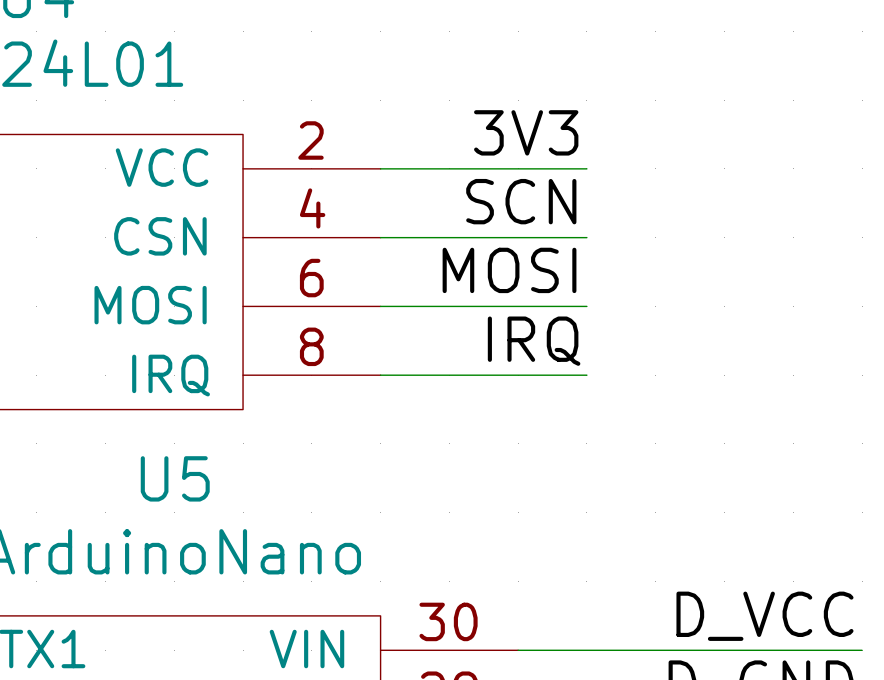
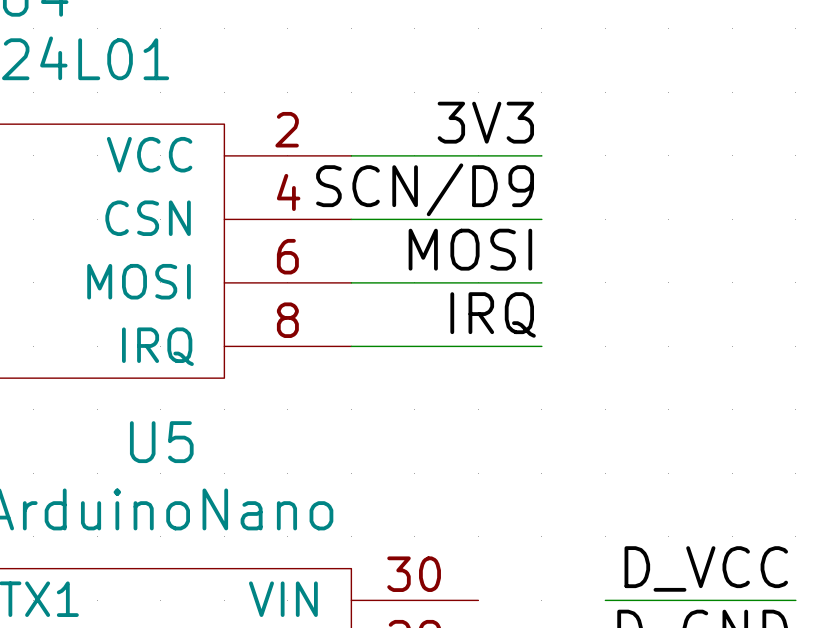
label: SCN (521, 201) -> SCN/D9 (425, 189)
wire: (518, 650) (655, 650) -> none

